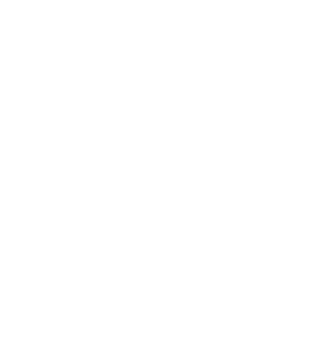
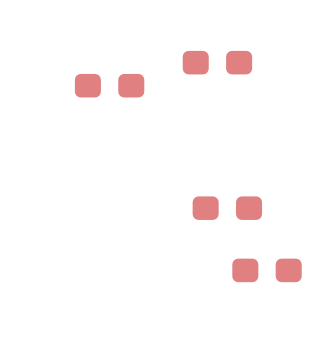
part: none -> (217, 62)
part: none -> (109, 85)
part: none -> (227, 208)
part: none -> (267, 270)

